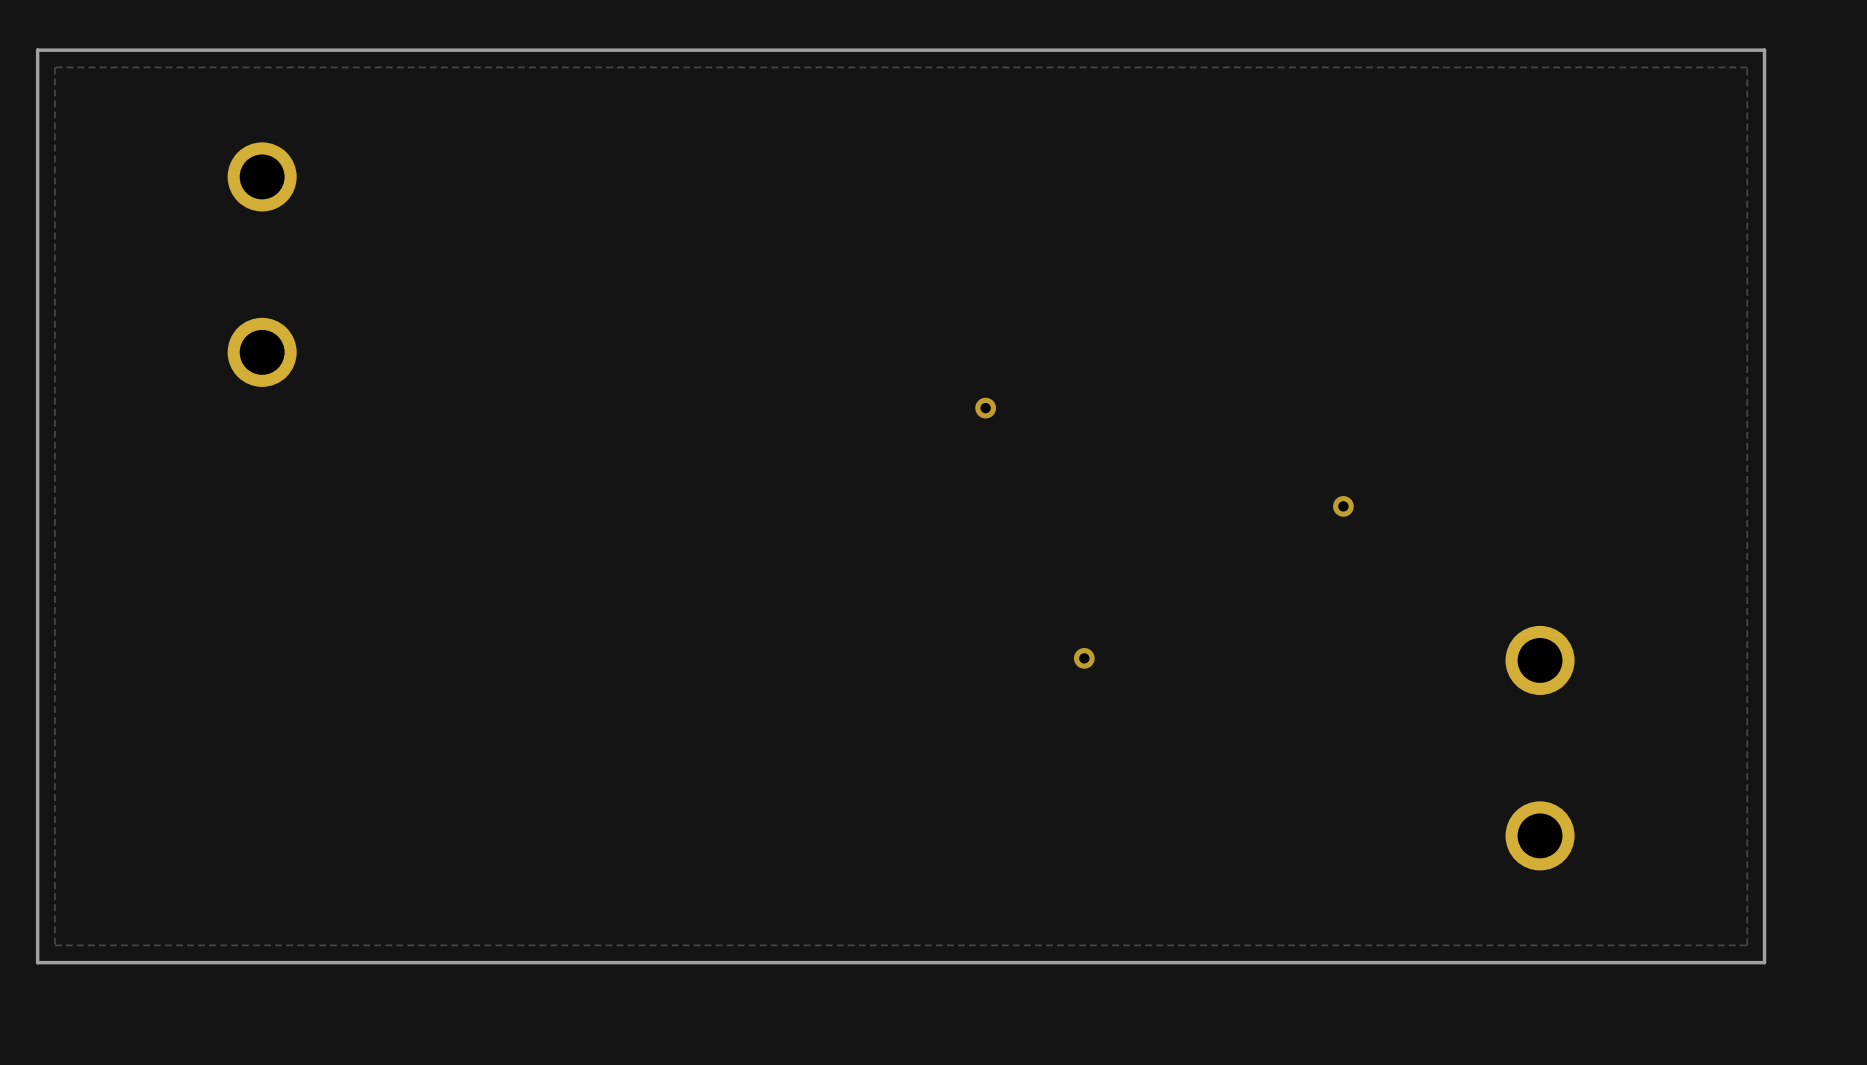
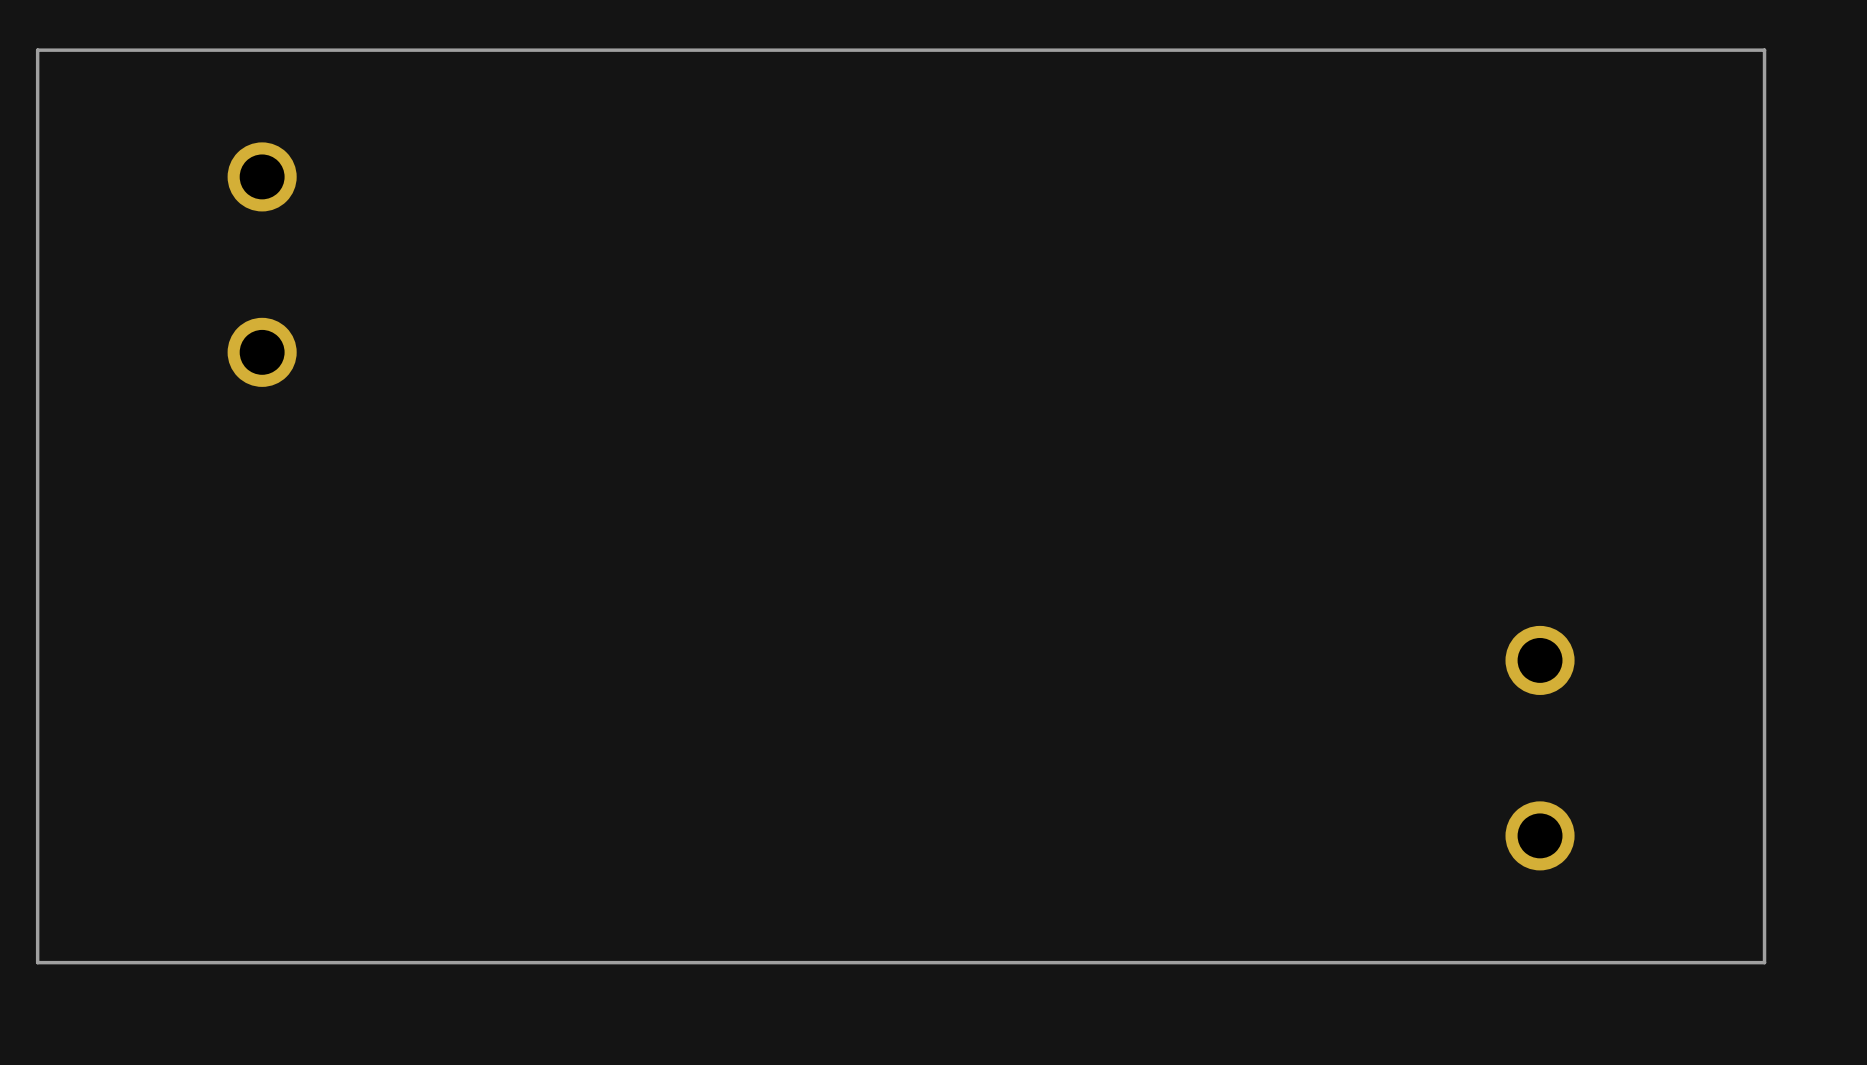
zone outline: (1747, 67) (54, 67) (54, 945) (1747, 945) (1747, 67) -> none
via: (985, 408) -> none
via: (1343, 506) -> none
via: (1084, 658) -> none

